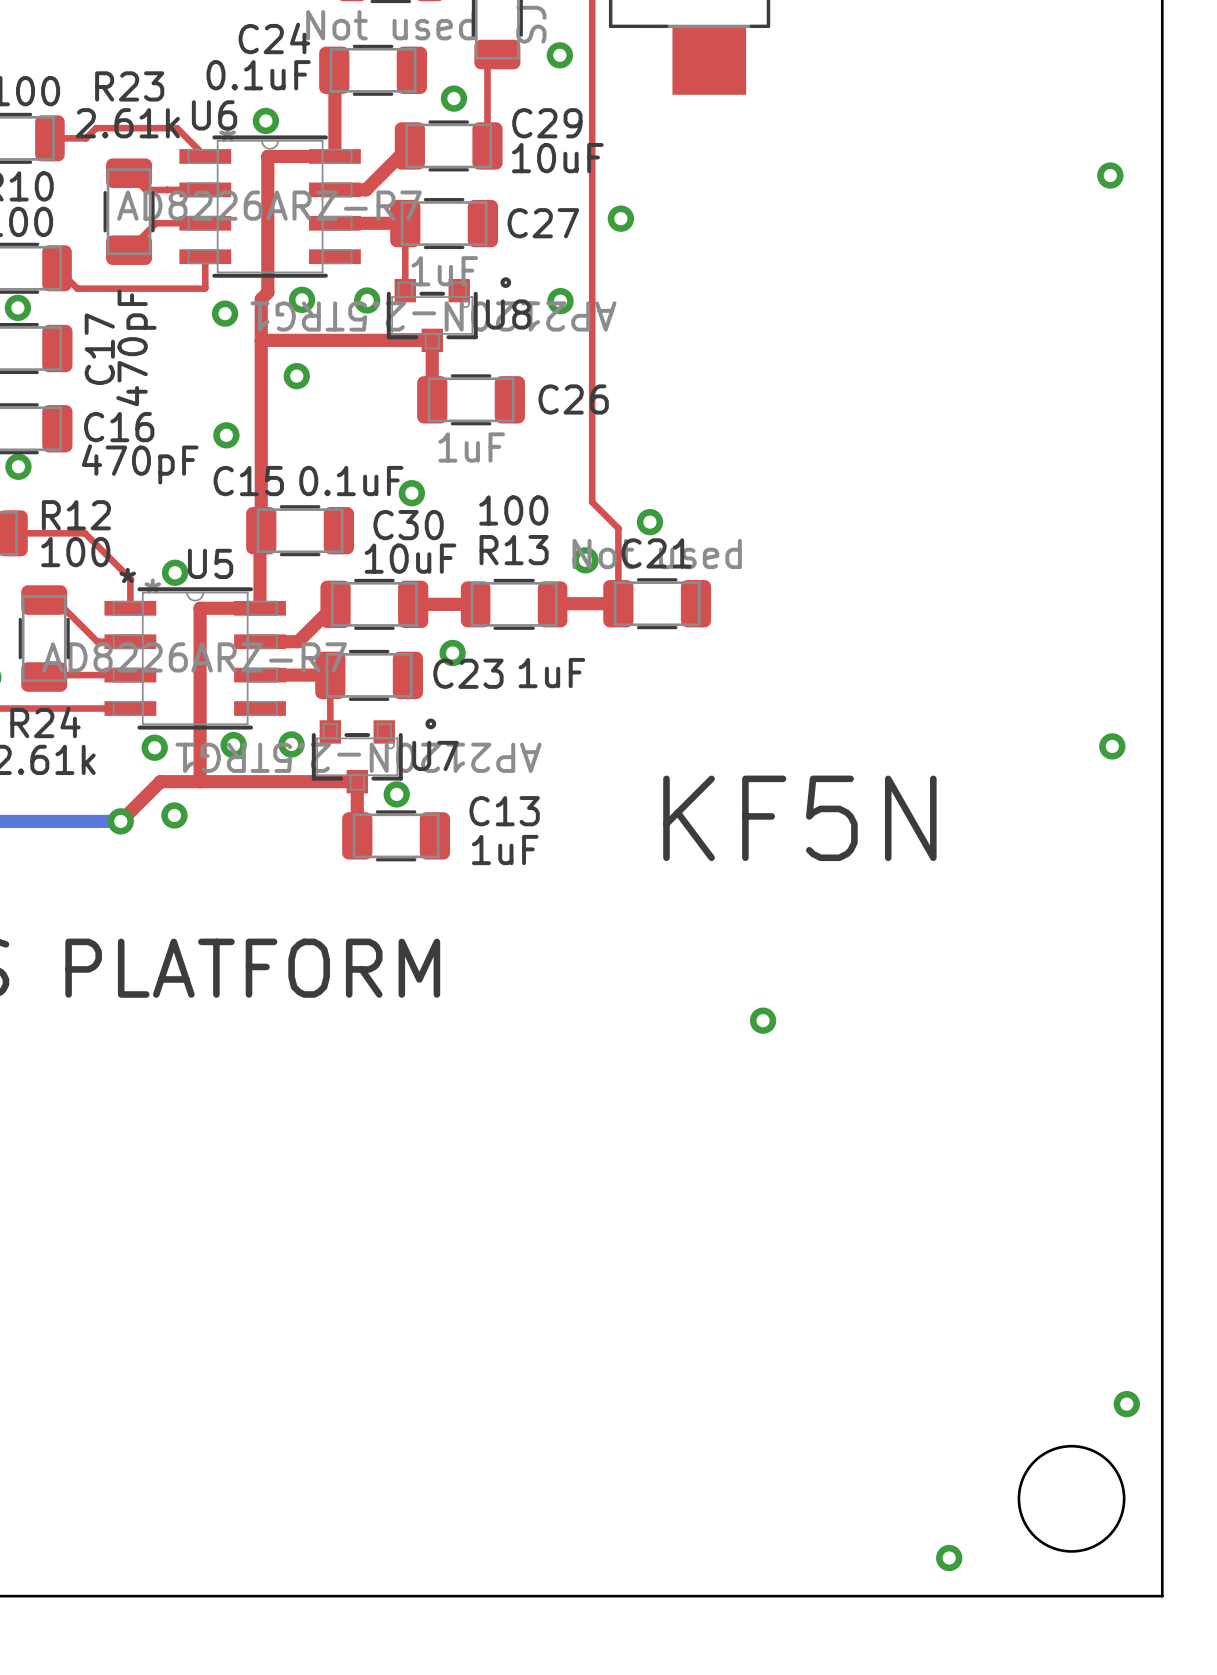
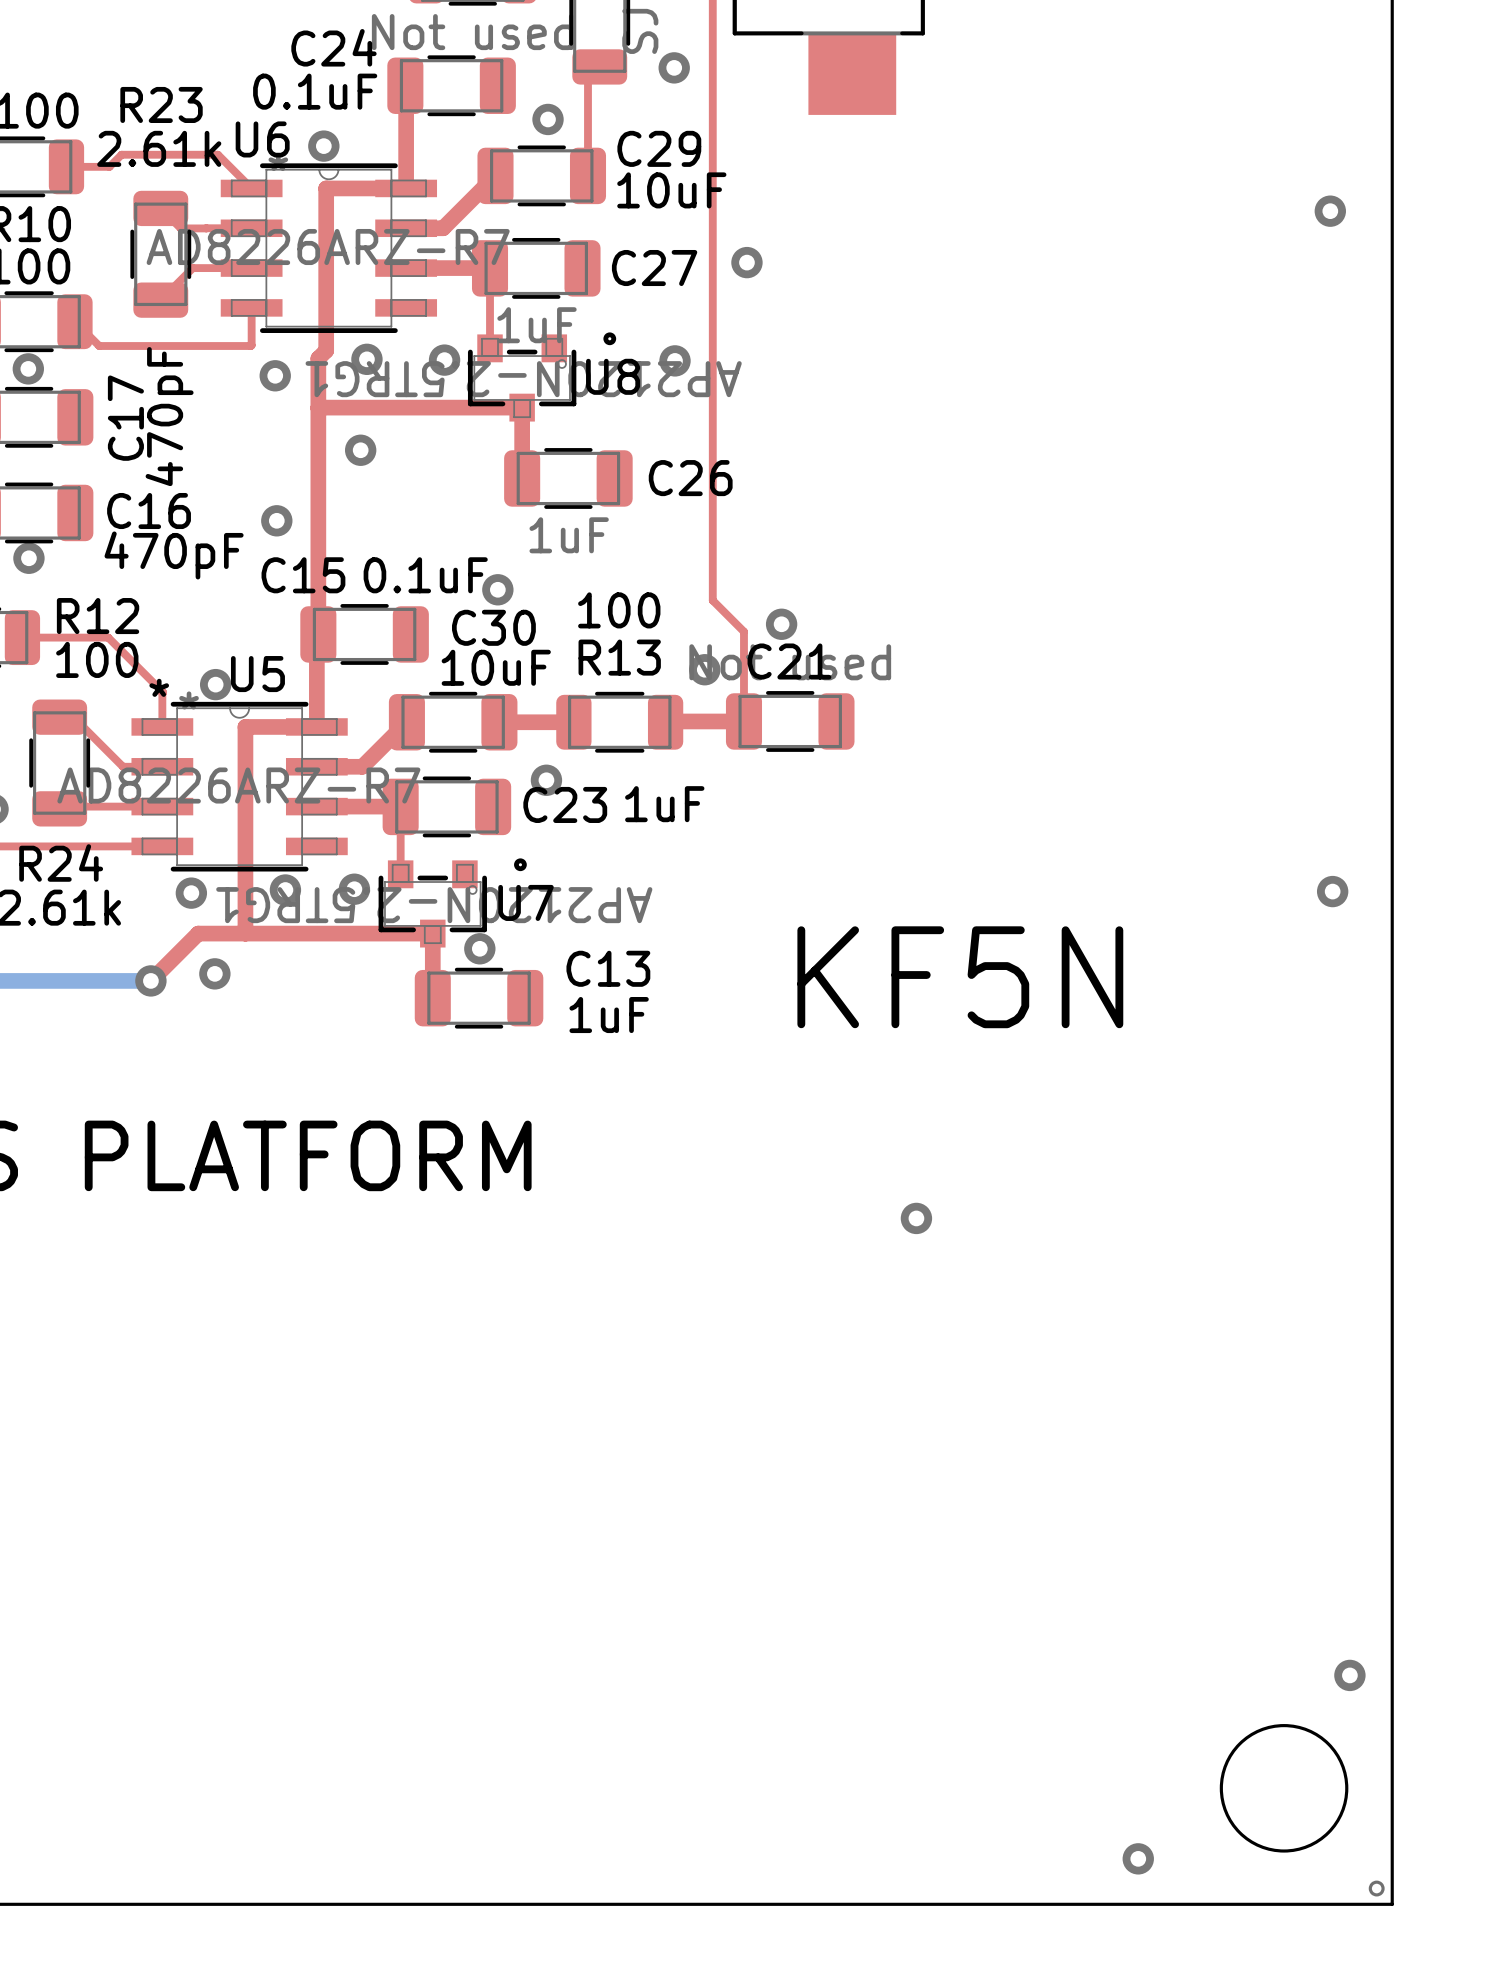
drawing: none -> [1368, 1880, 1385, 1897]

